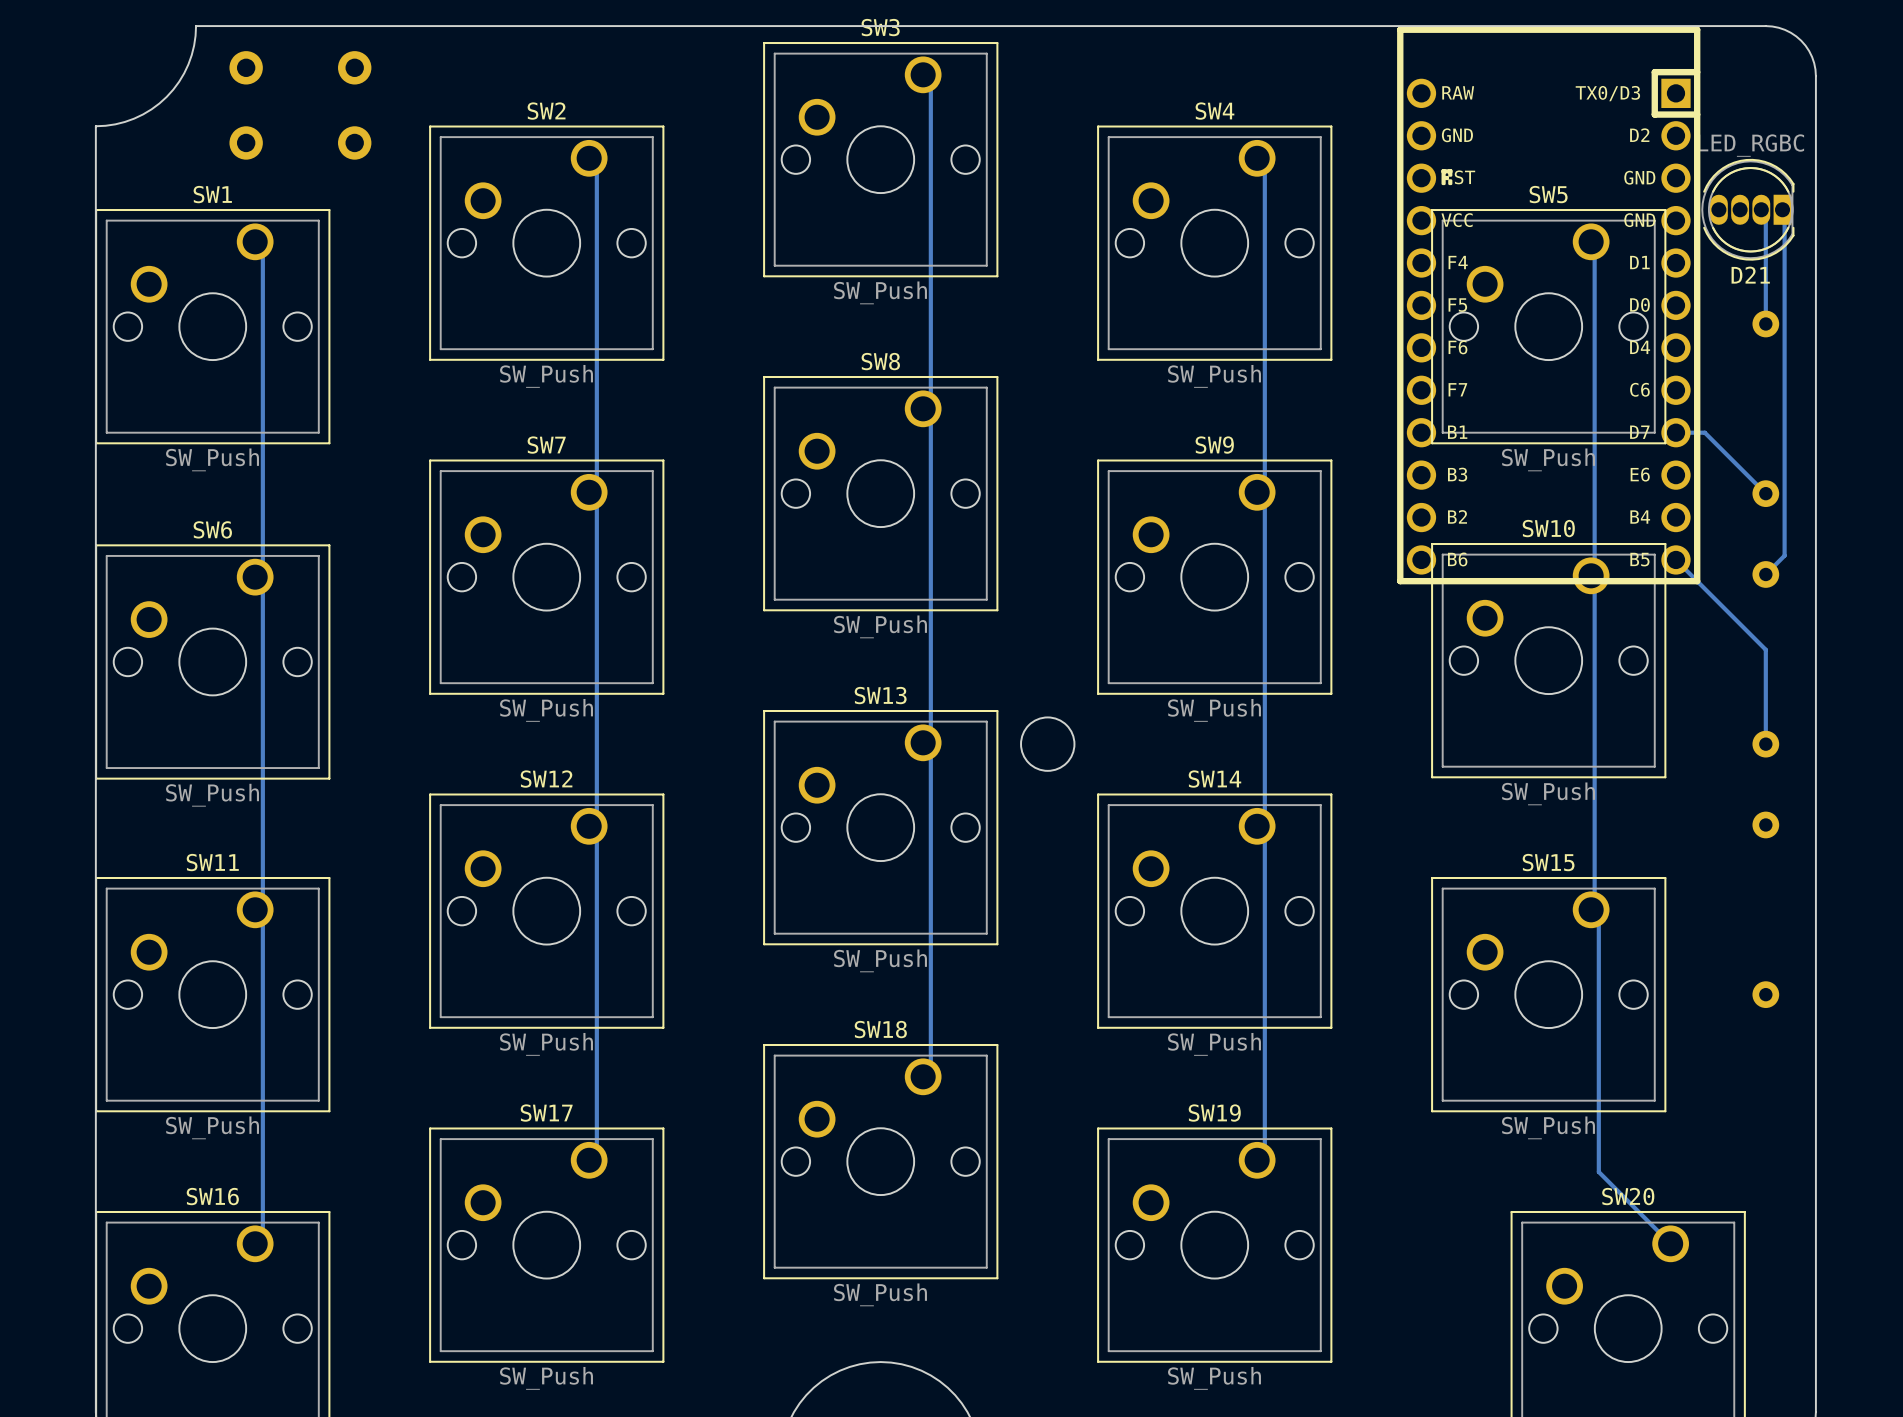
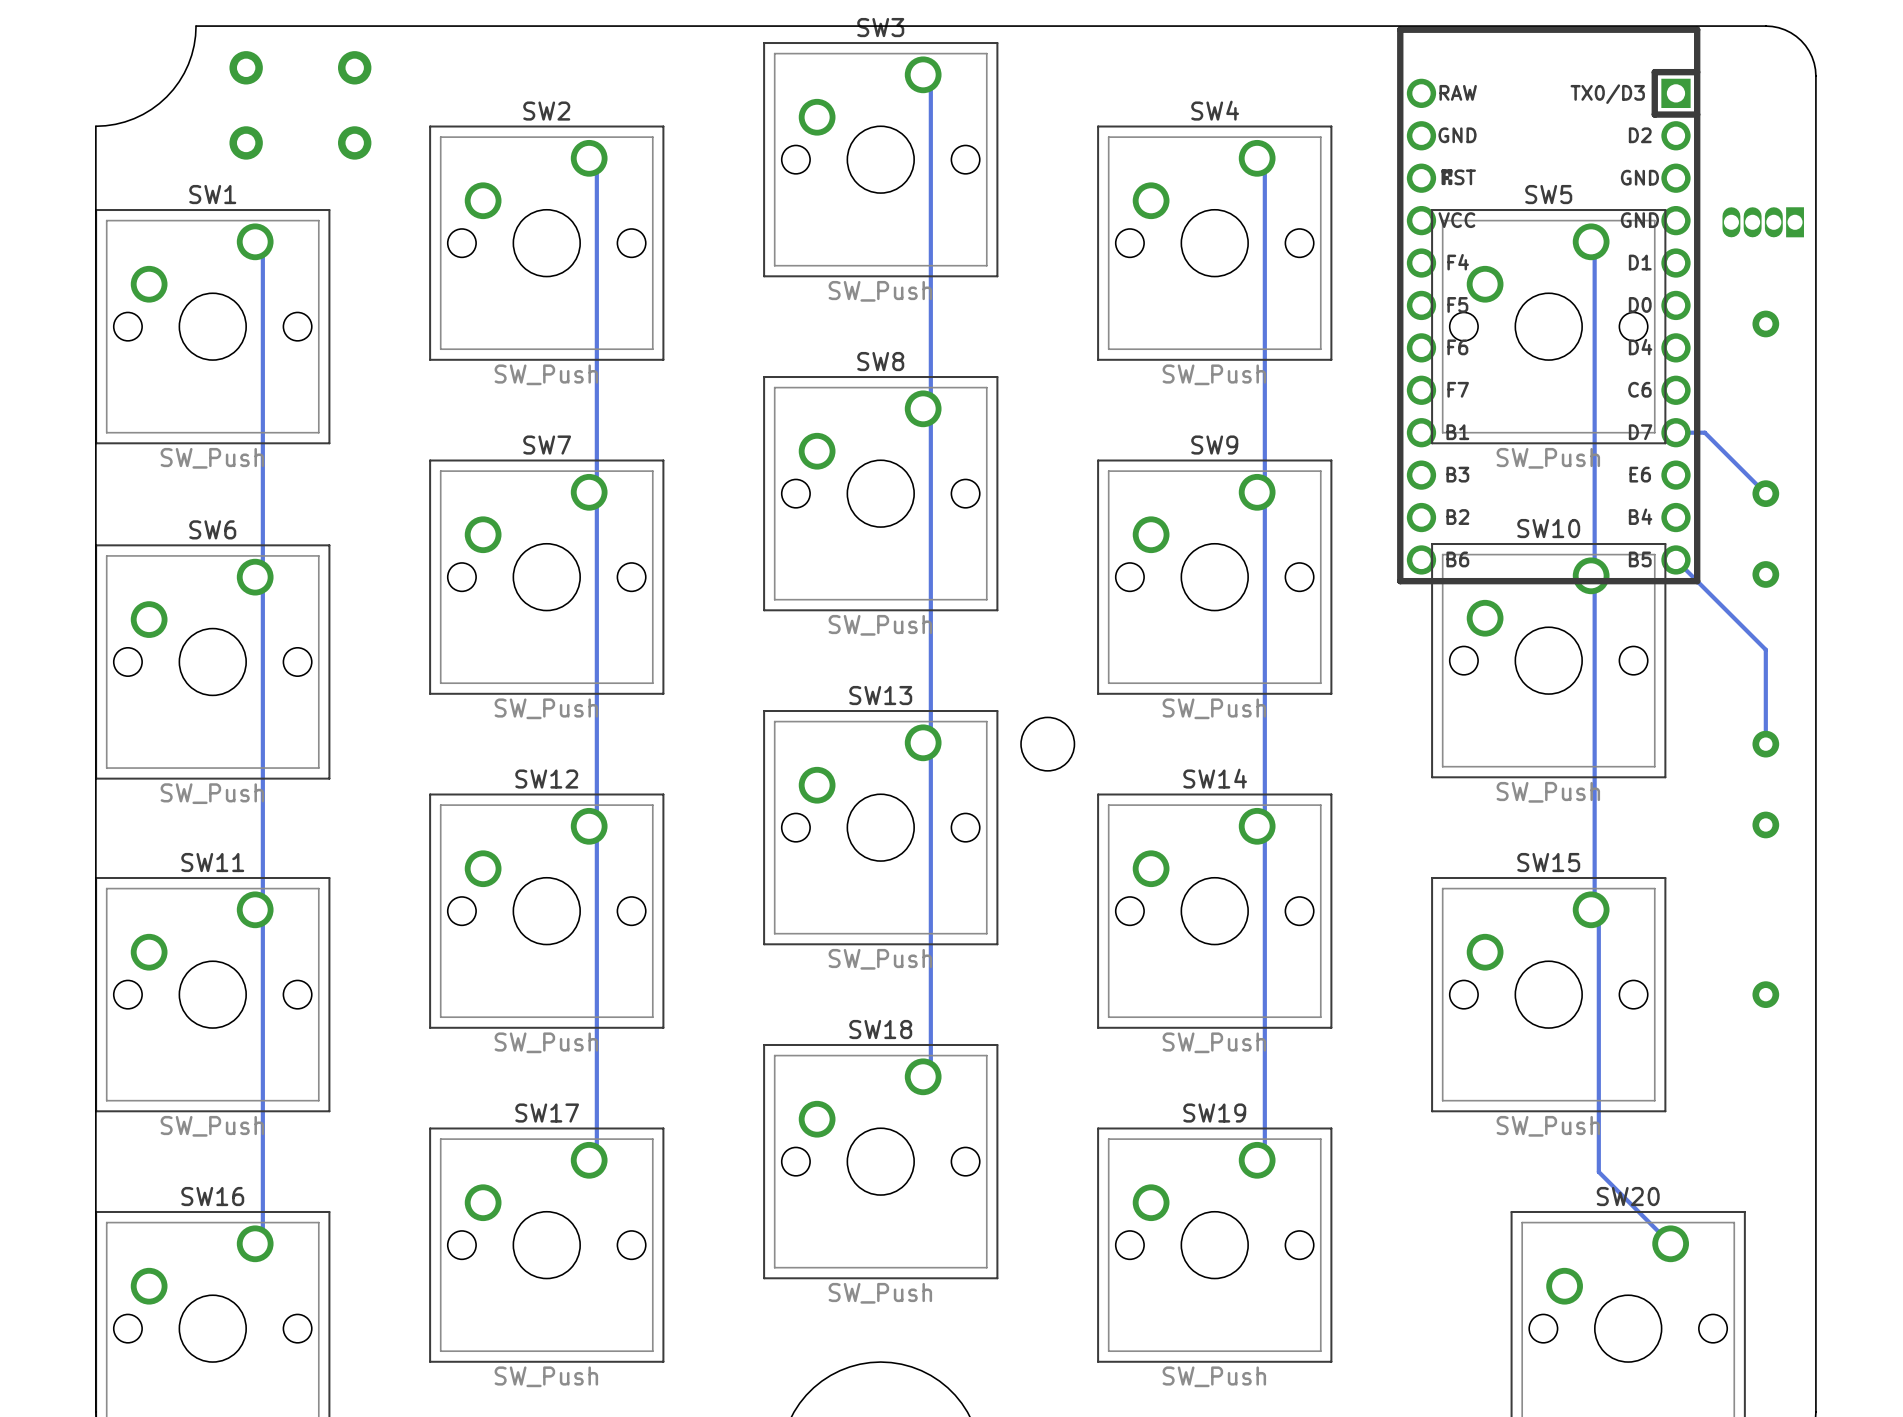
D21: LED_RGBC (1747, 209) -> none
track: (1761, 209) (1765, 214) (1765, 323) -> none
track: (1782, 209) (1784, 211) (1784, 555) (1765, 574) -> none
part: none -> (1763, 222)

